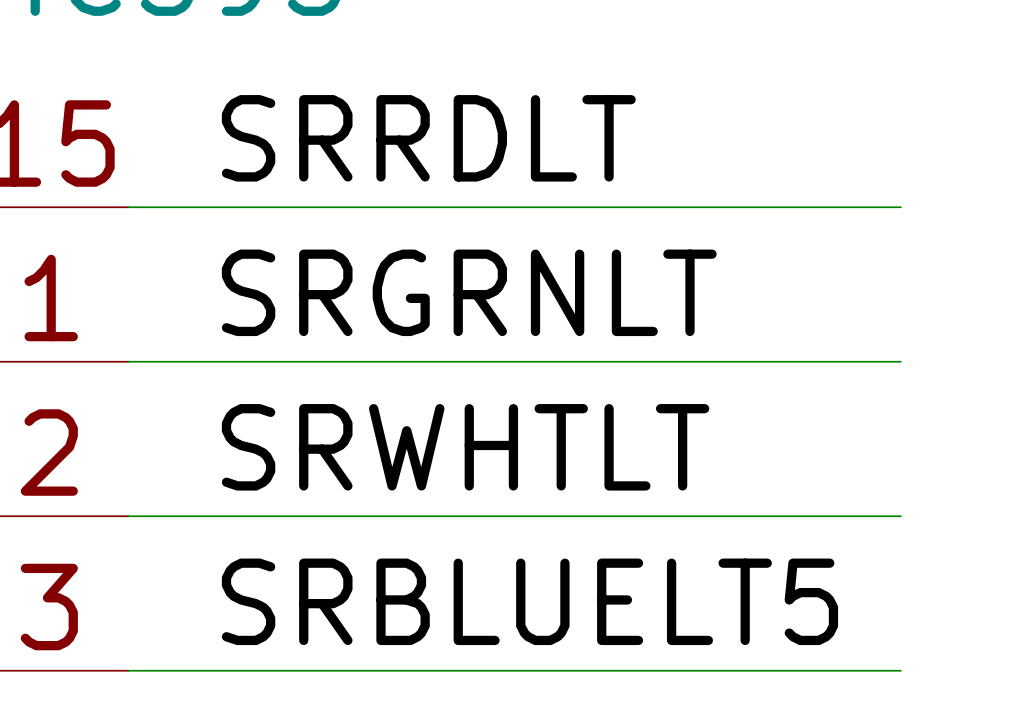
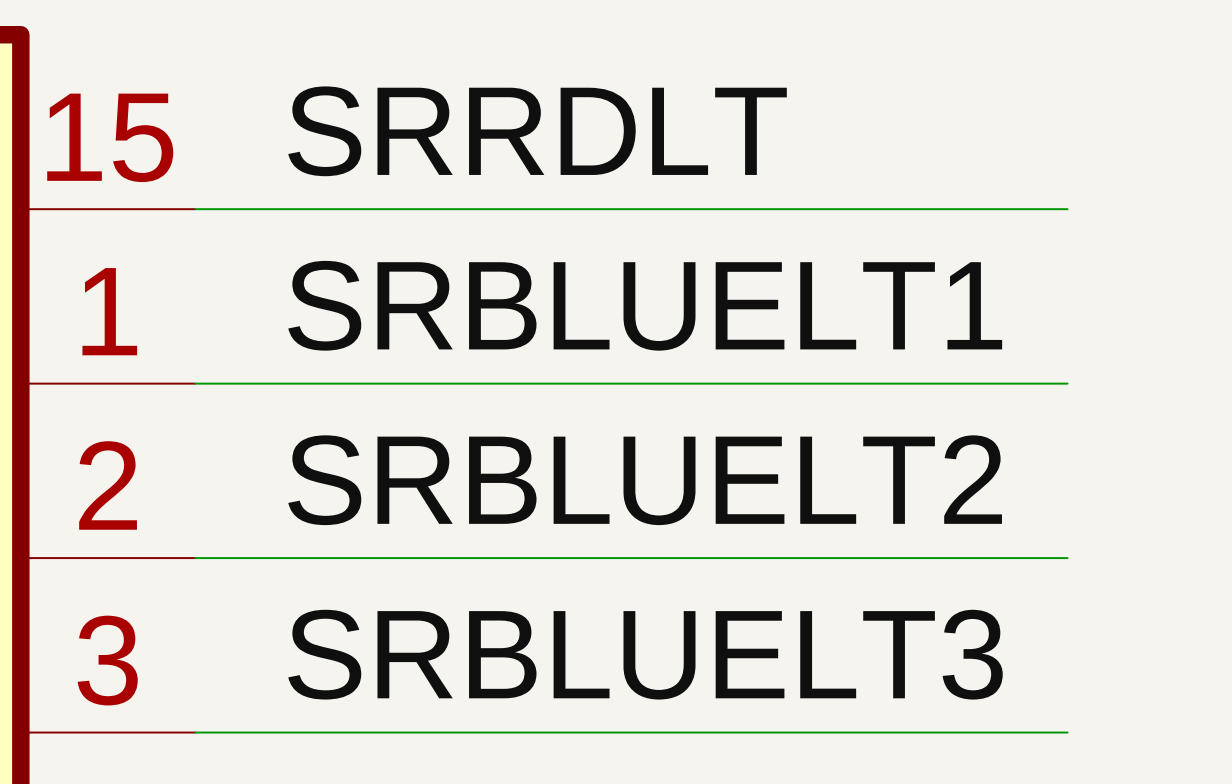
label: SRGRNLT (469, 292) -> SRBLUELT1 (645, 305)
label: SRWHTLT (465, 447) -> SRBLUELT2 (645, 480)
label: SRBLUELT5 (529, 601) -> SRBLUELT3 (645, 654)

